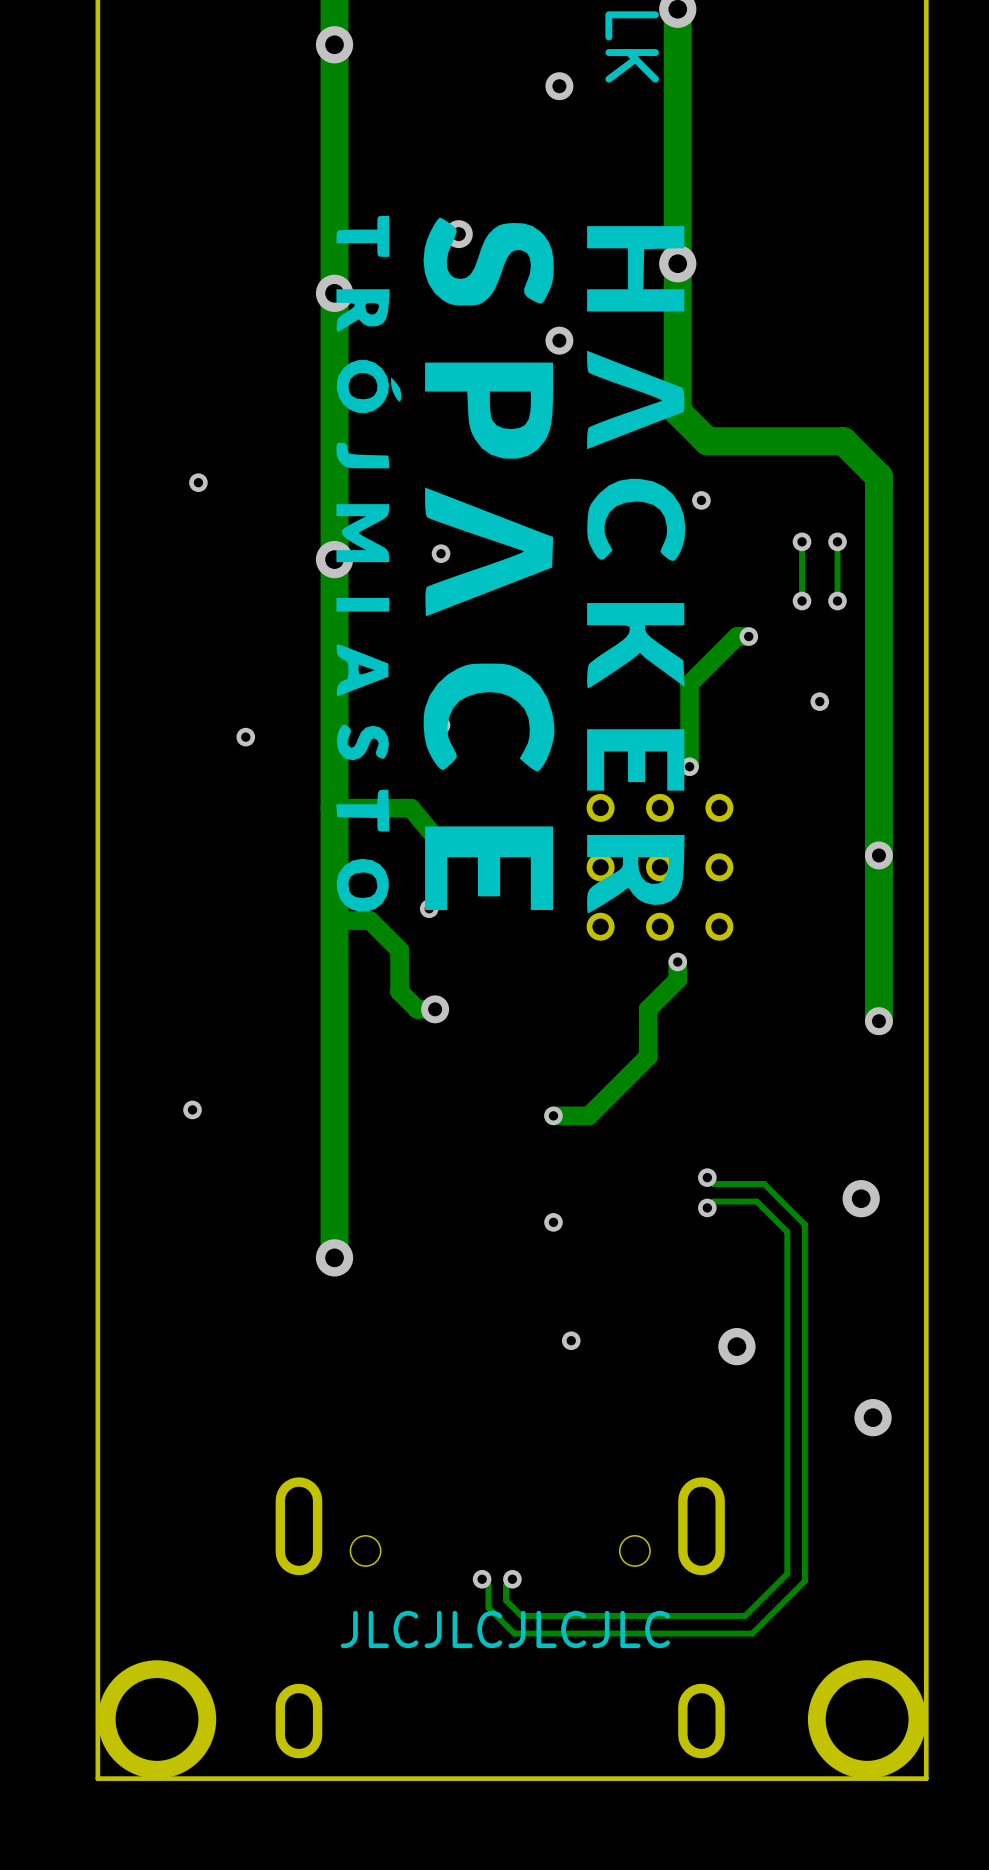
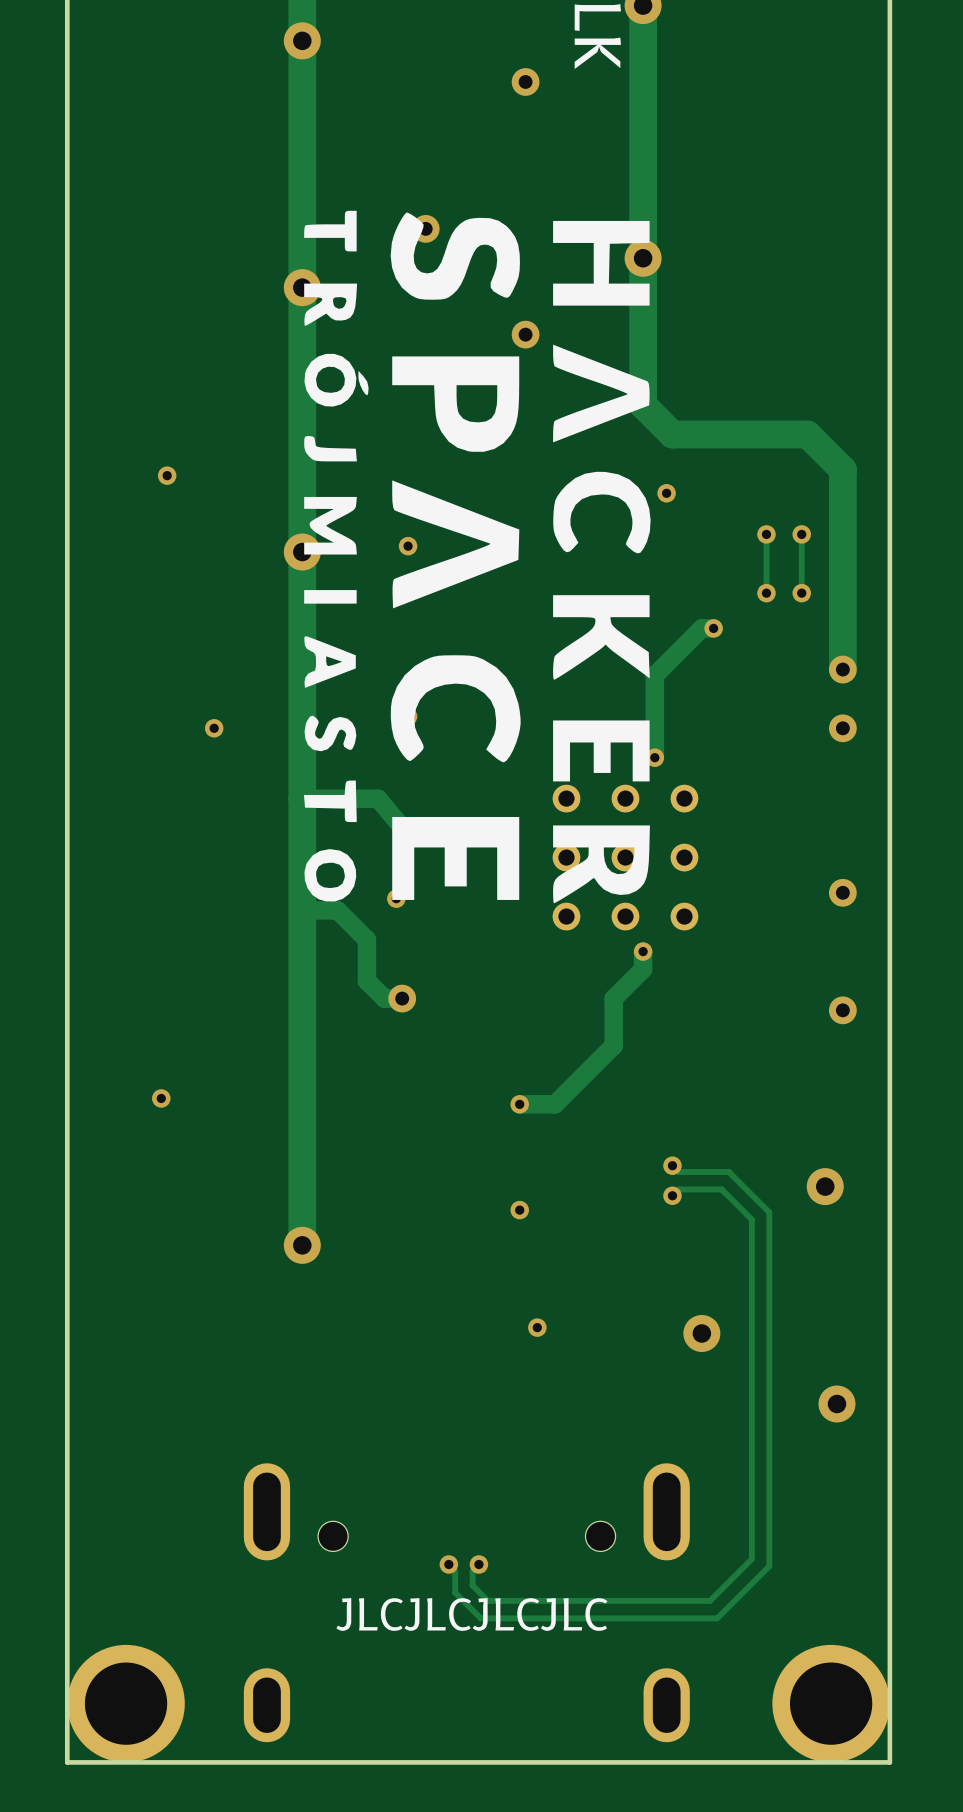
track: (878, 677) (878, 1021) -> none
via: none -> (842, 669)
via: (819, 701) -> none
via: none -> (842, 728)
via position: (878, 855) -> (842, 892)

